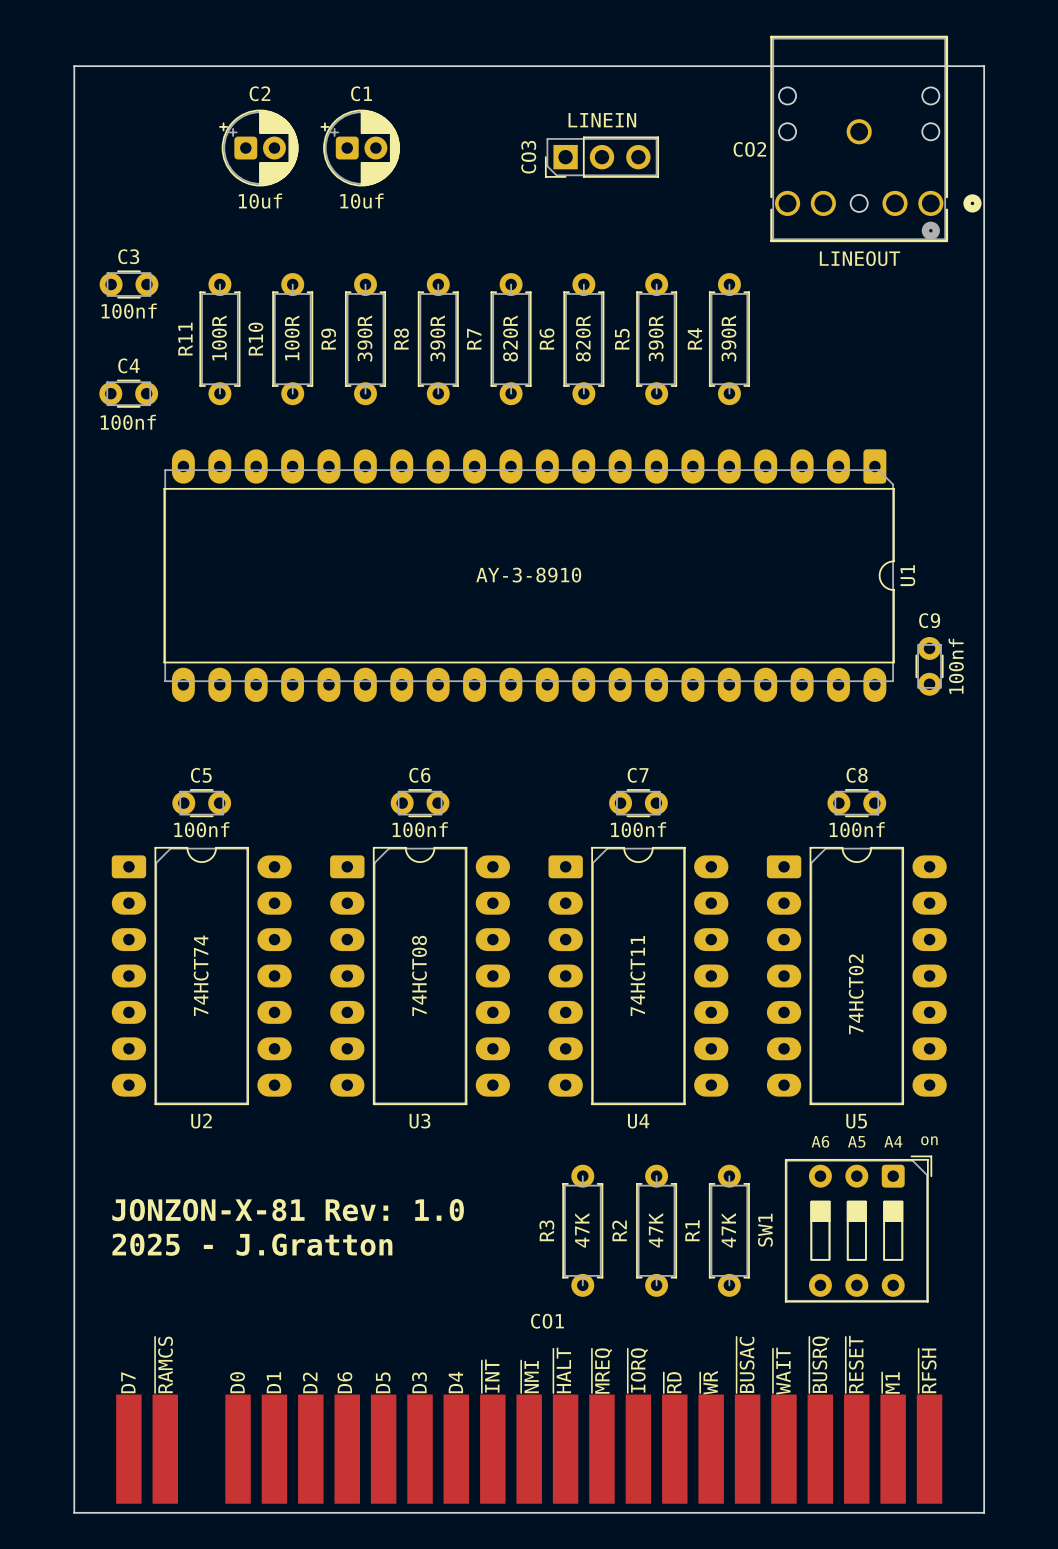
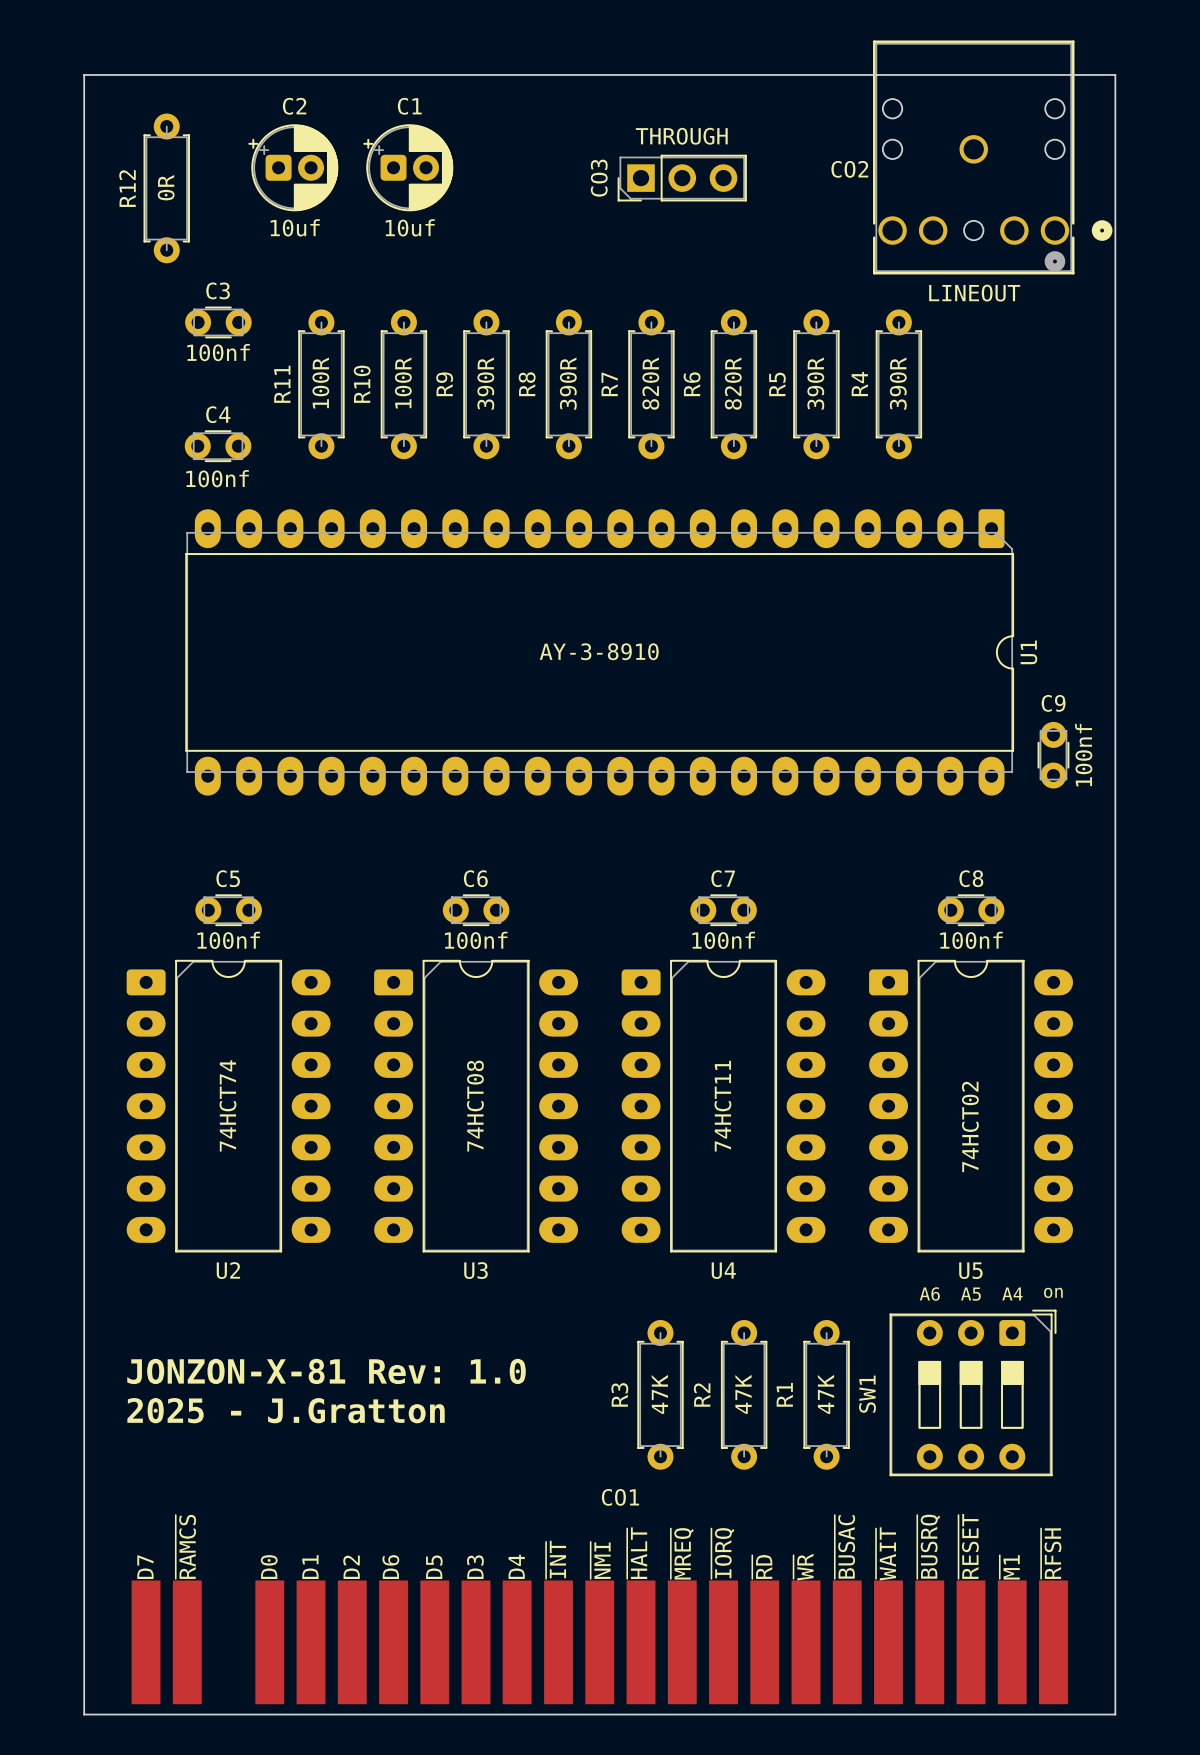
CO3 value: LINEIN (602, 120) -> THROUGH (681, 136)
R12: none -> 0R (166, 188)
C3 position: (129, 284) -> (218, 322)
R11 position: (219, 339) -> (321, 384)
R10 position: (292, 339) -> (403, 384)
R9 position: (365, 339) -> (486, 384)
R8 position: (438, 339) -> (568, 384)
R7 position: (511, 339) -> (651, 384)
R6 position: (583, 339) -> (733, 384)
R5 position: (656, 339) -> (816, 384)
R4 position: (729, 339) -> (898, 384)
C4 position: (128, 393) -> (218, 446)

